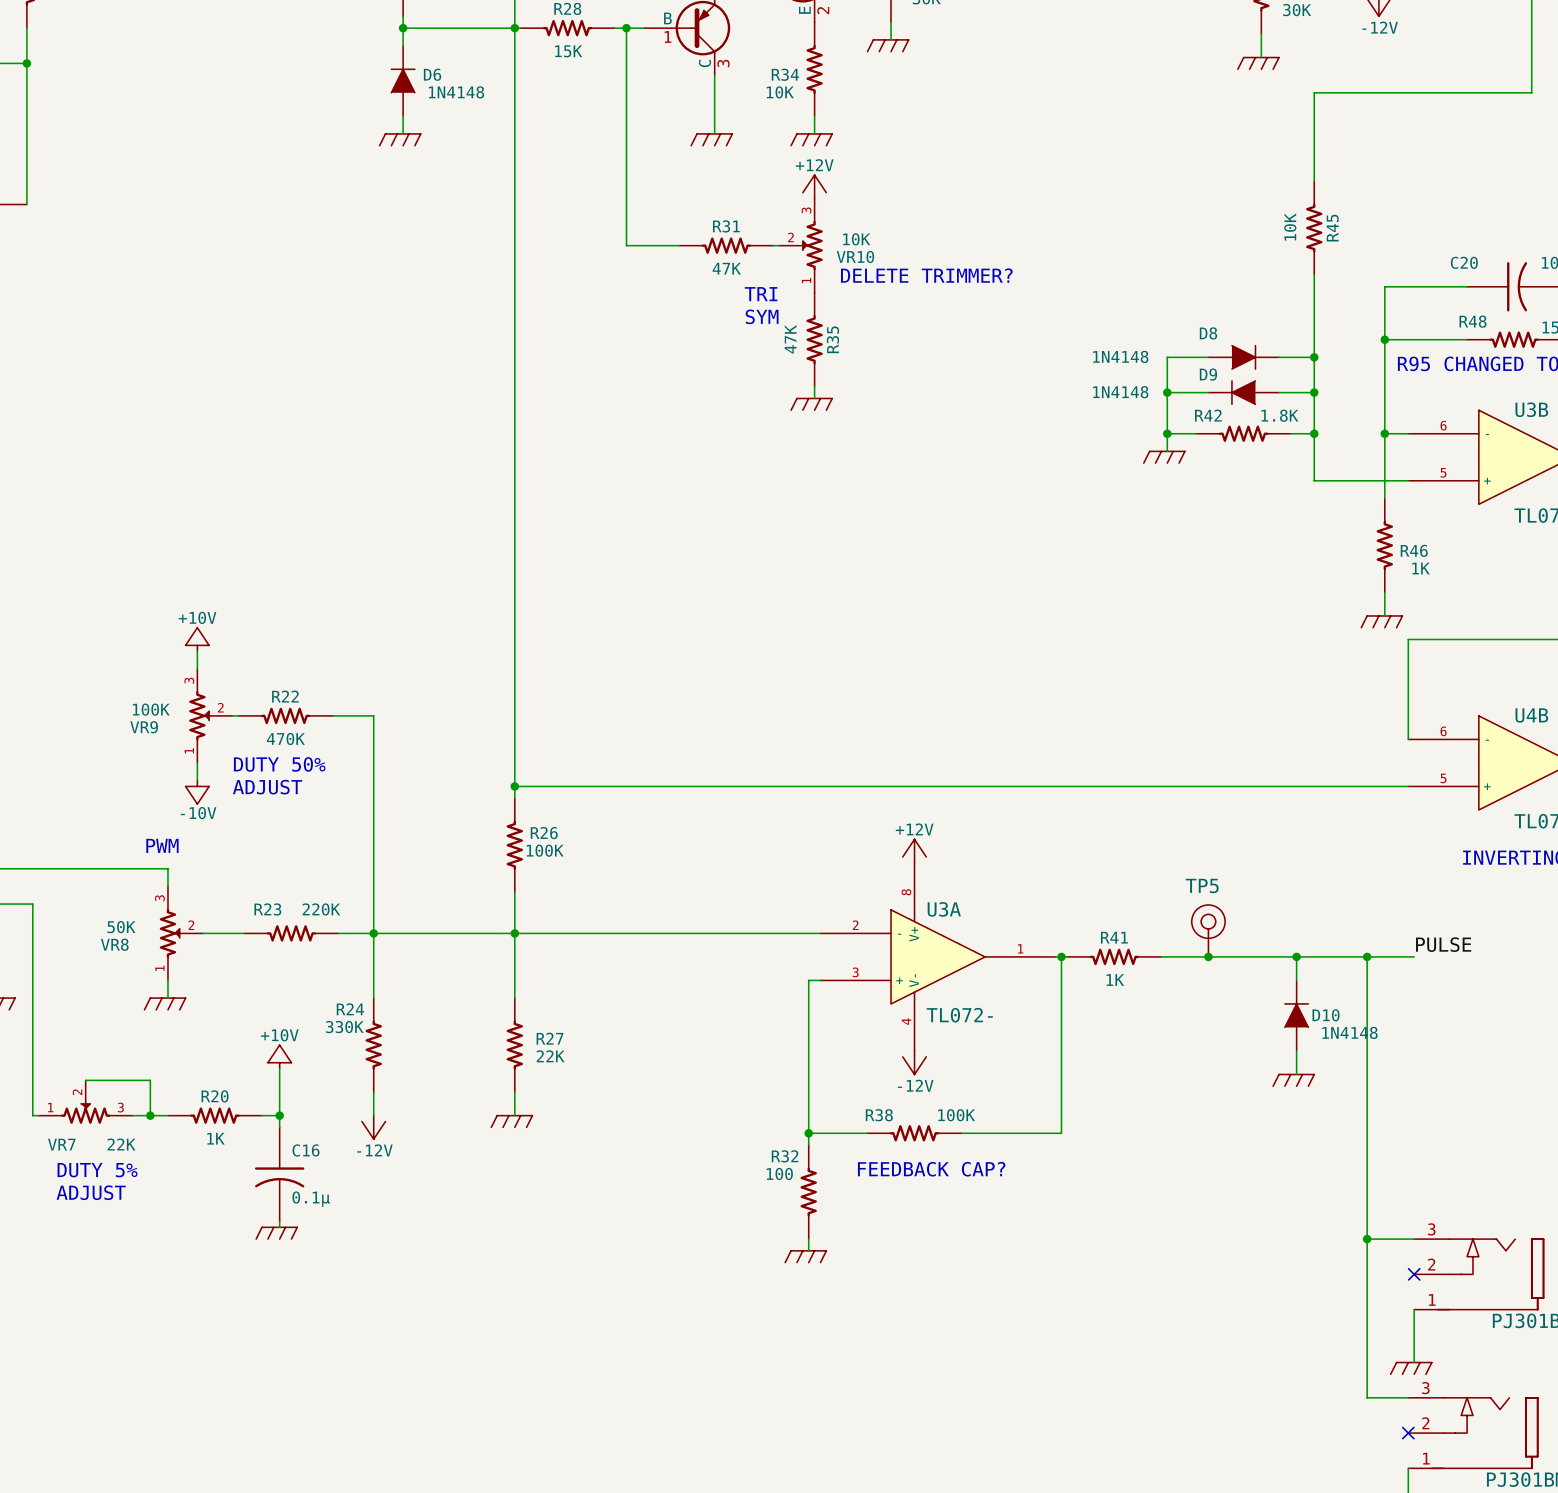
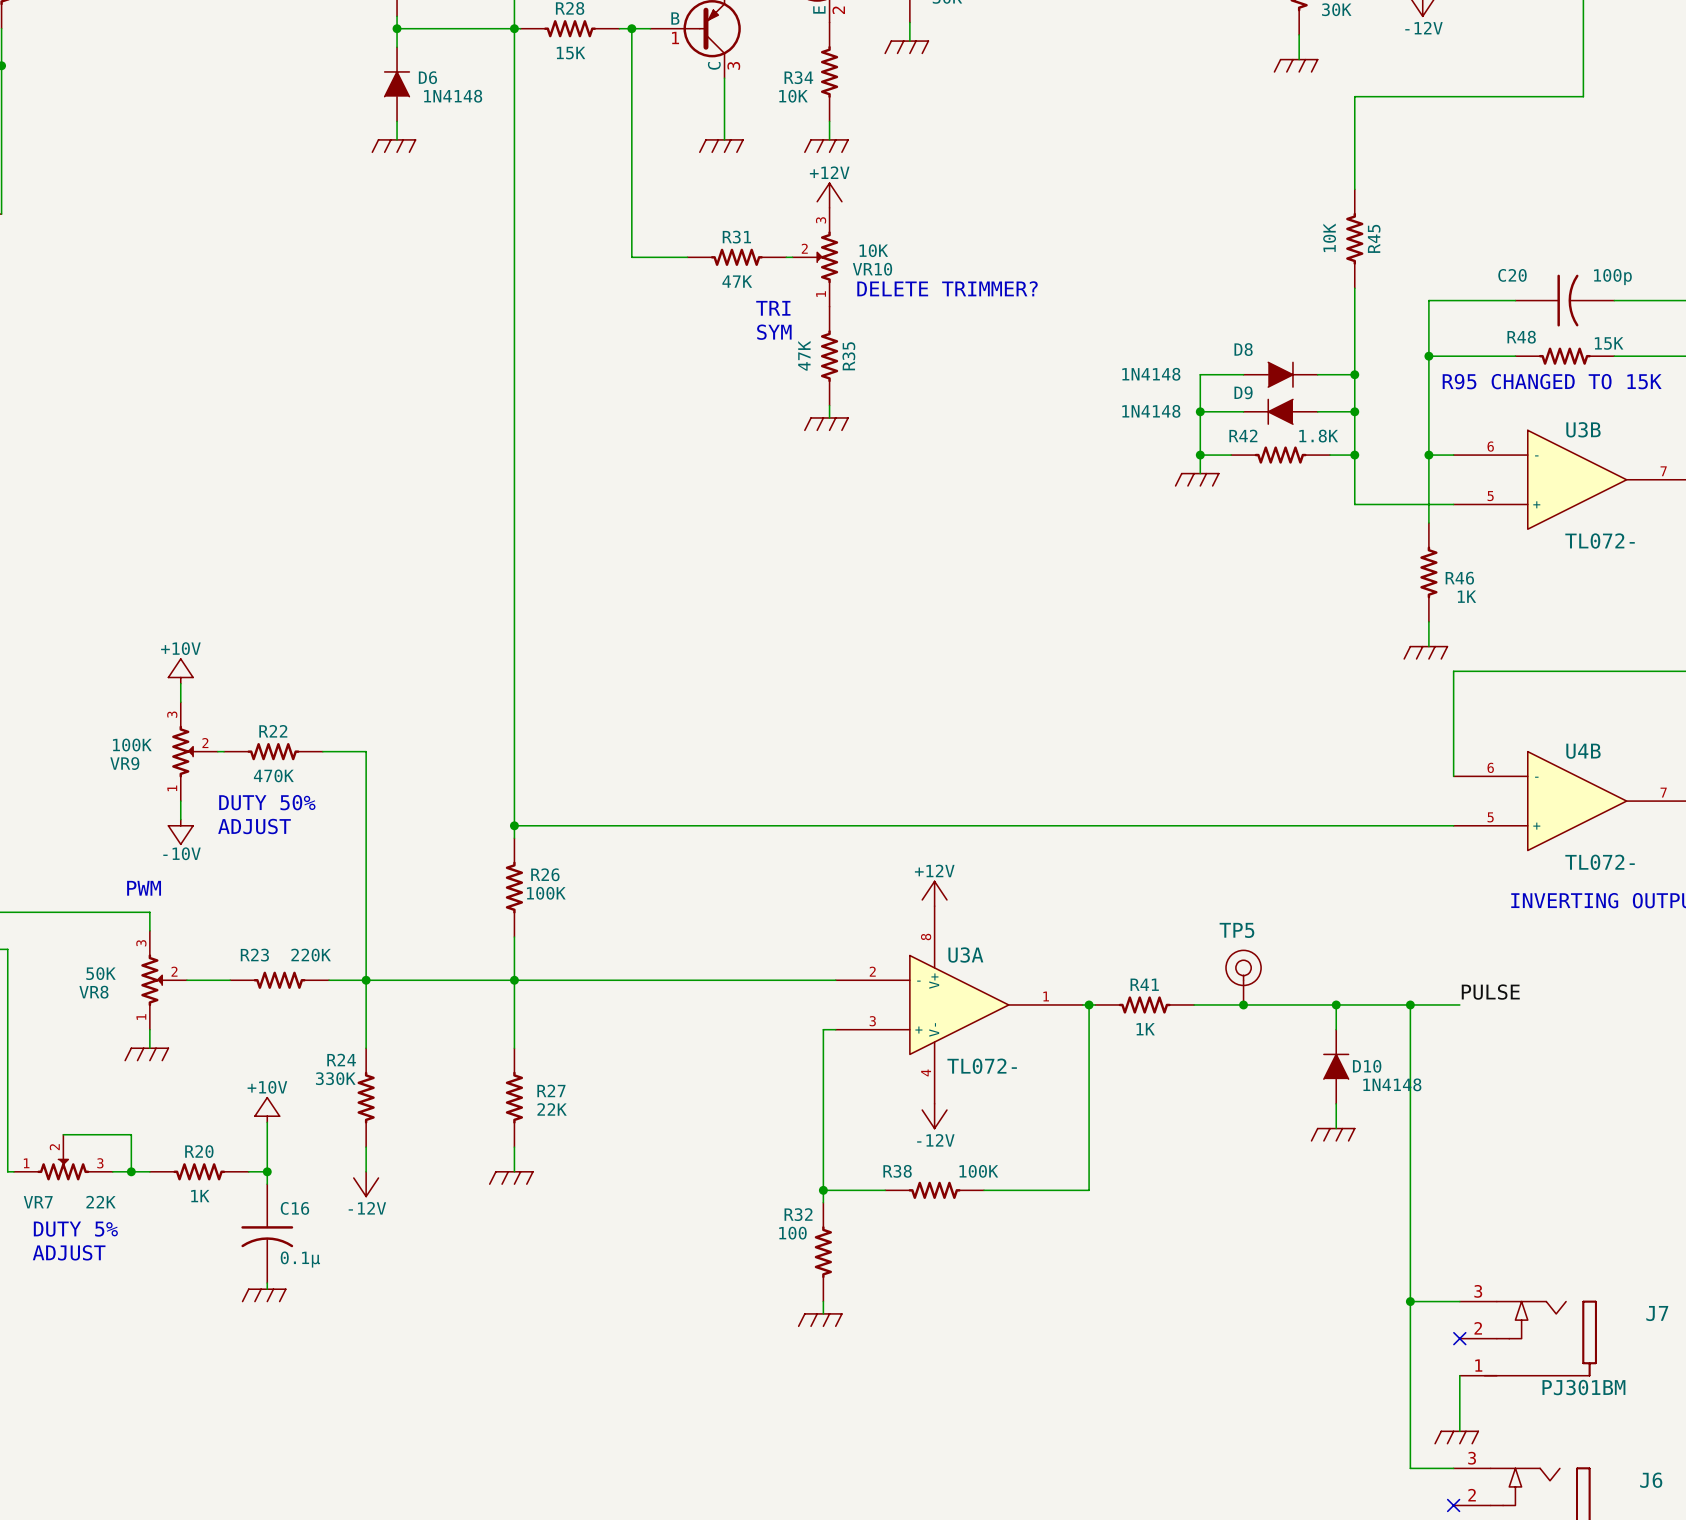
text: FEEDBACK CAP? (931, 1169) -> none

